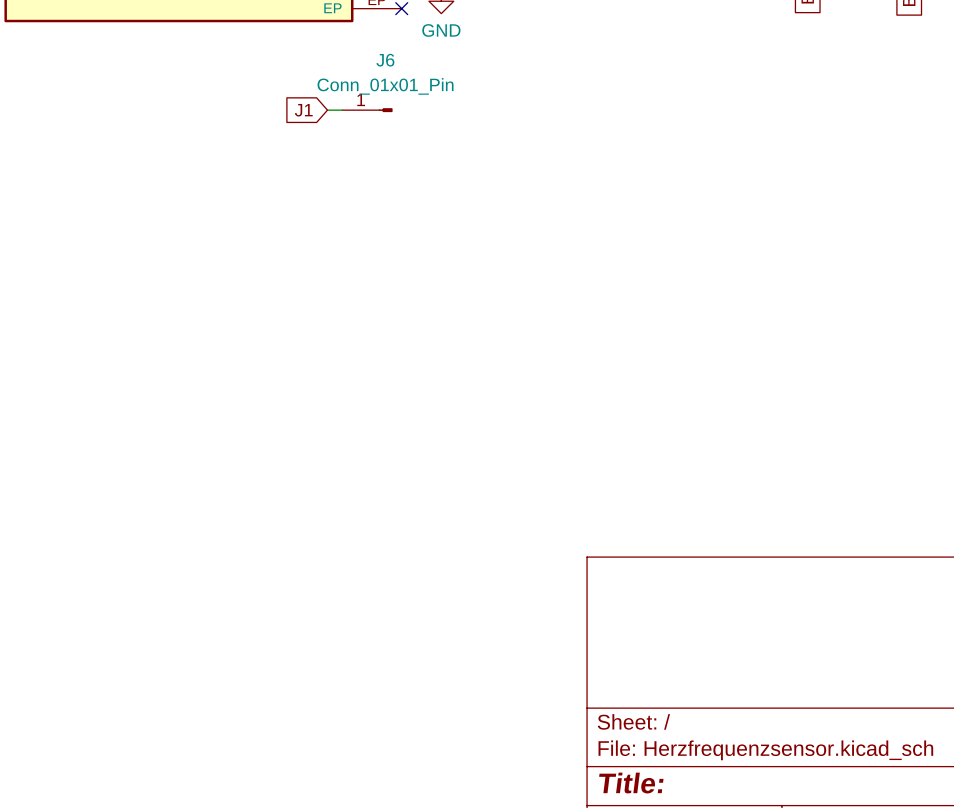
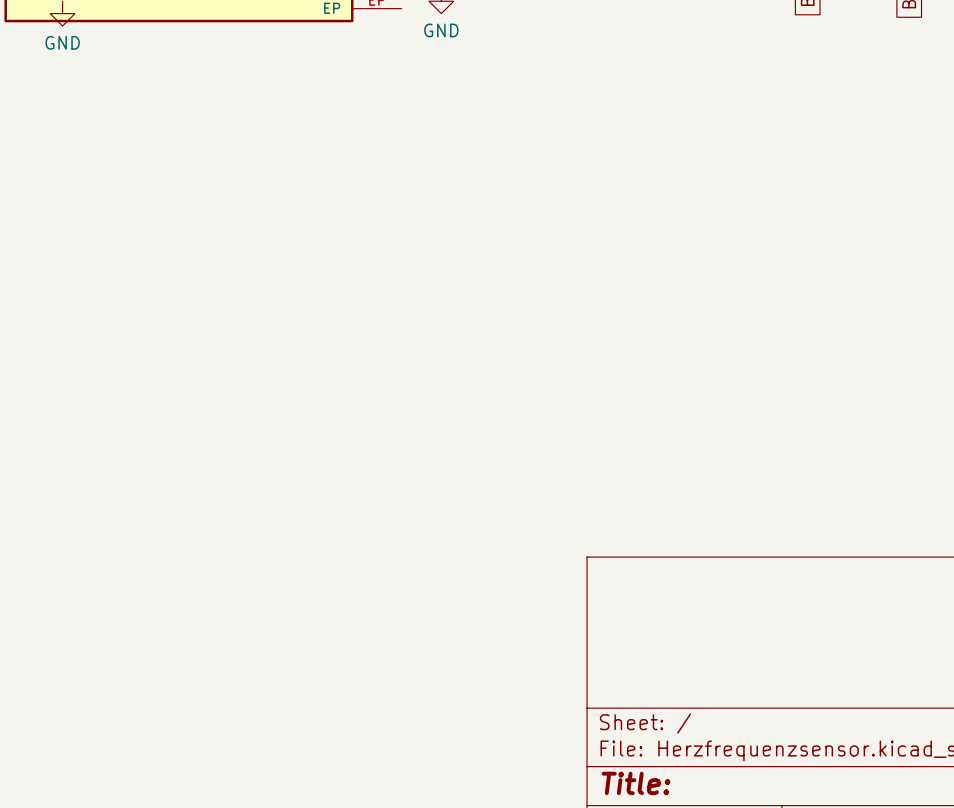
no-connect mark: (401, 8) -> none
power symbol: none -> GND (62, 13)
global label: J1 (303, 110) -> none
wire: (327, 110) (342, 110) -> none
J6: Conn_01x01_Pin (367, 110) -> none

